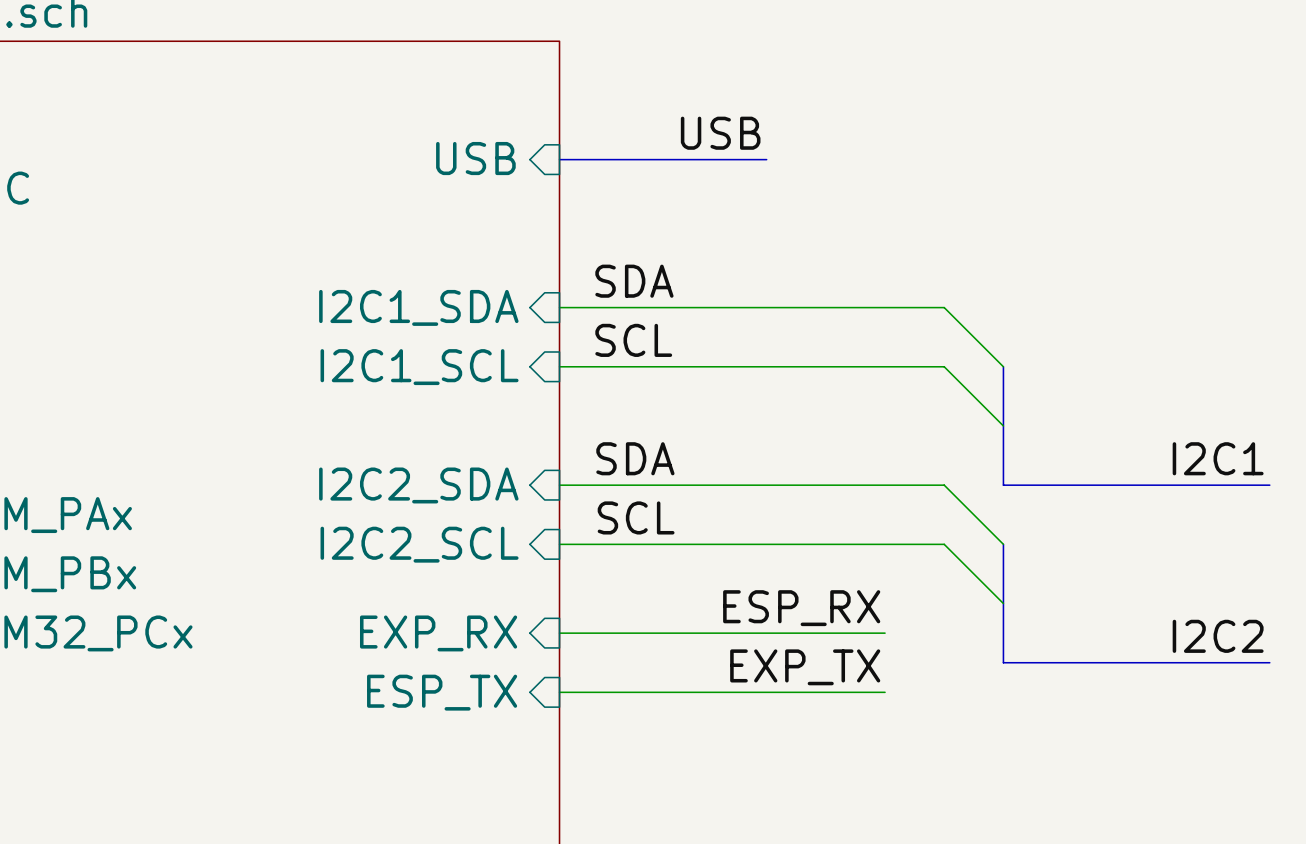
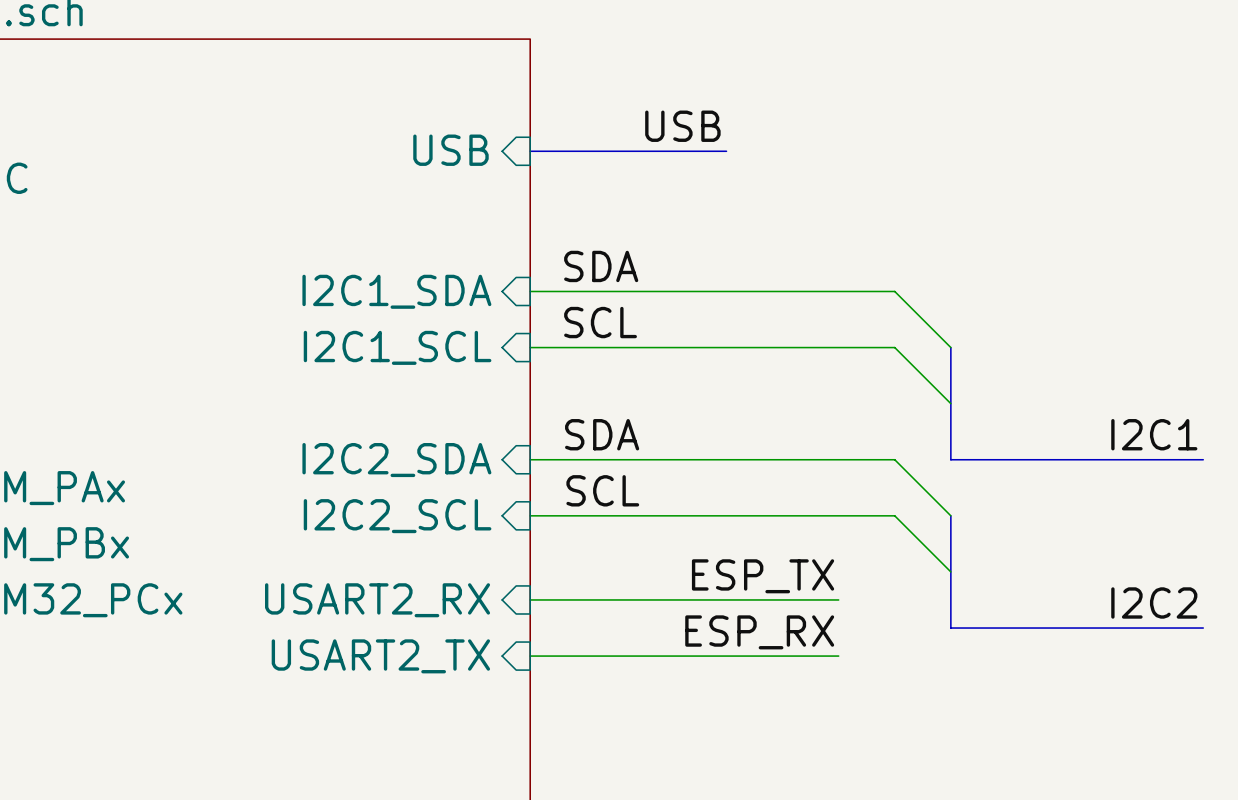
label: ESP_RX (801, 608) -> ESP_TX (763, 576)
sheet pin: EXP_RX (438, 633) -> USART2_RX (377, 600)
label: EXP_TX (805, 667) -> ESP_RX (759, 632)
sheet pin: ESP_TX (442, 692) -> USART2_TX (380, 656)

